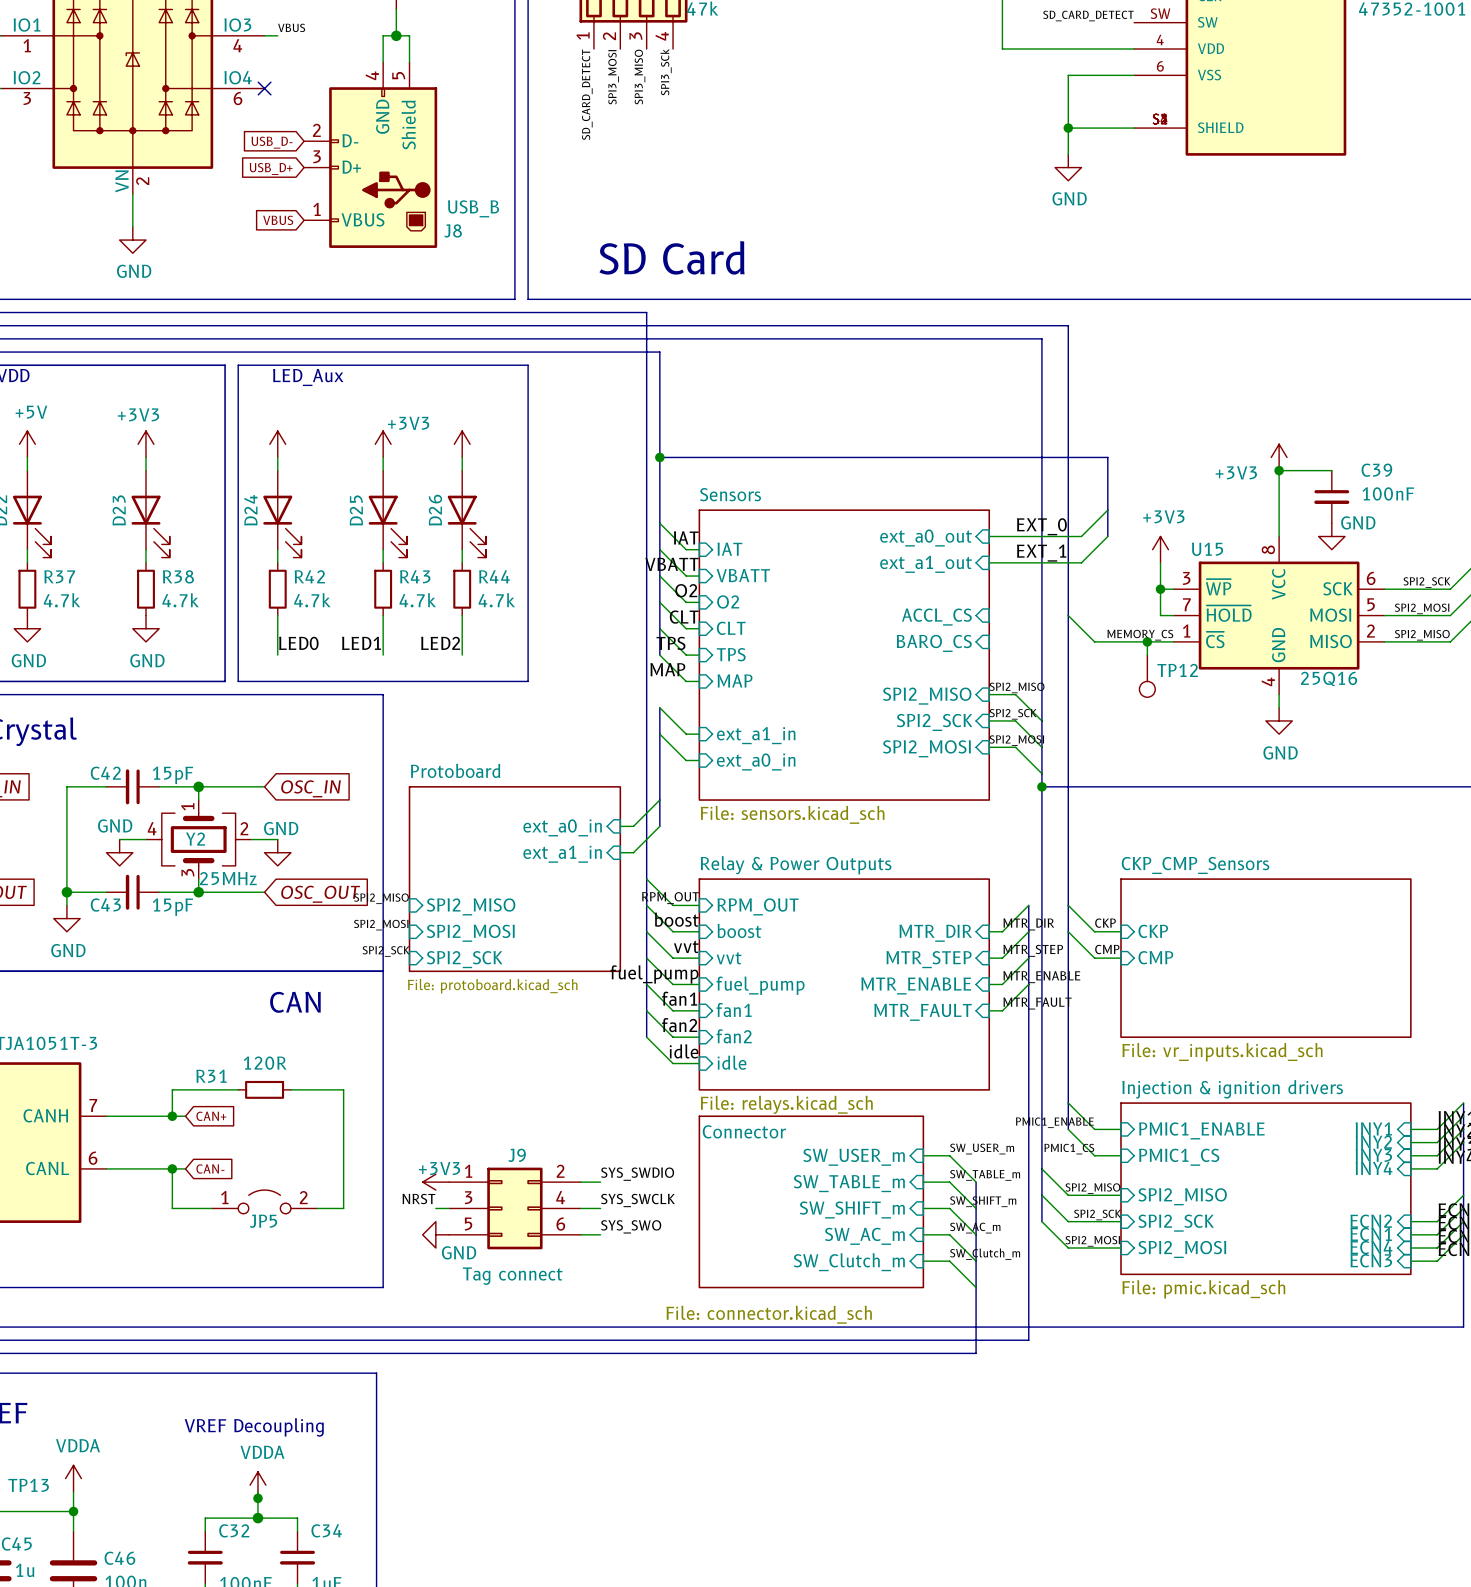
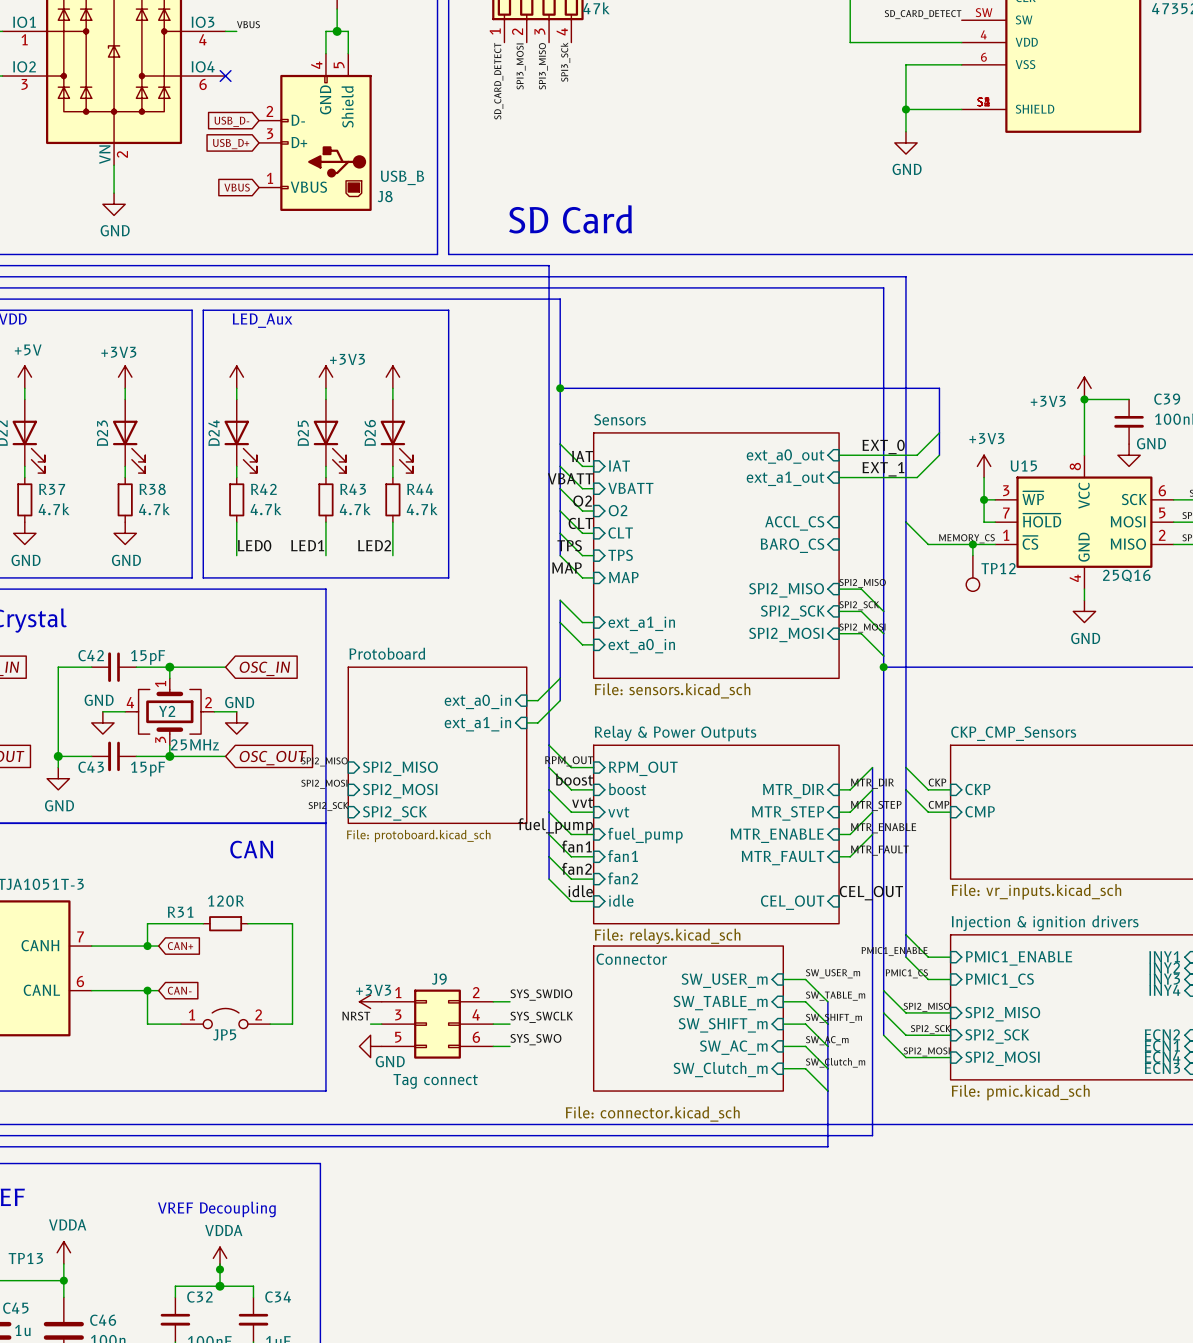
label: none -> CEL_OUT (871, 893)
sheet pin: none -> CEL_OUT (792, 902)

